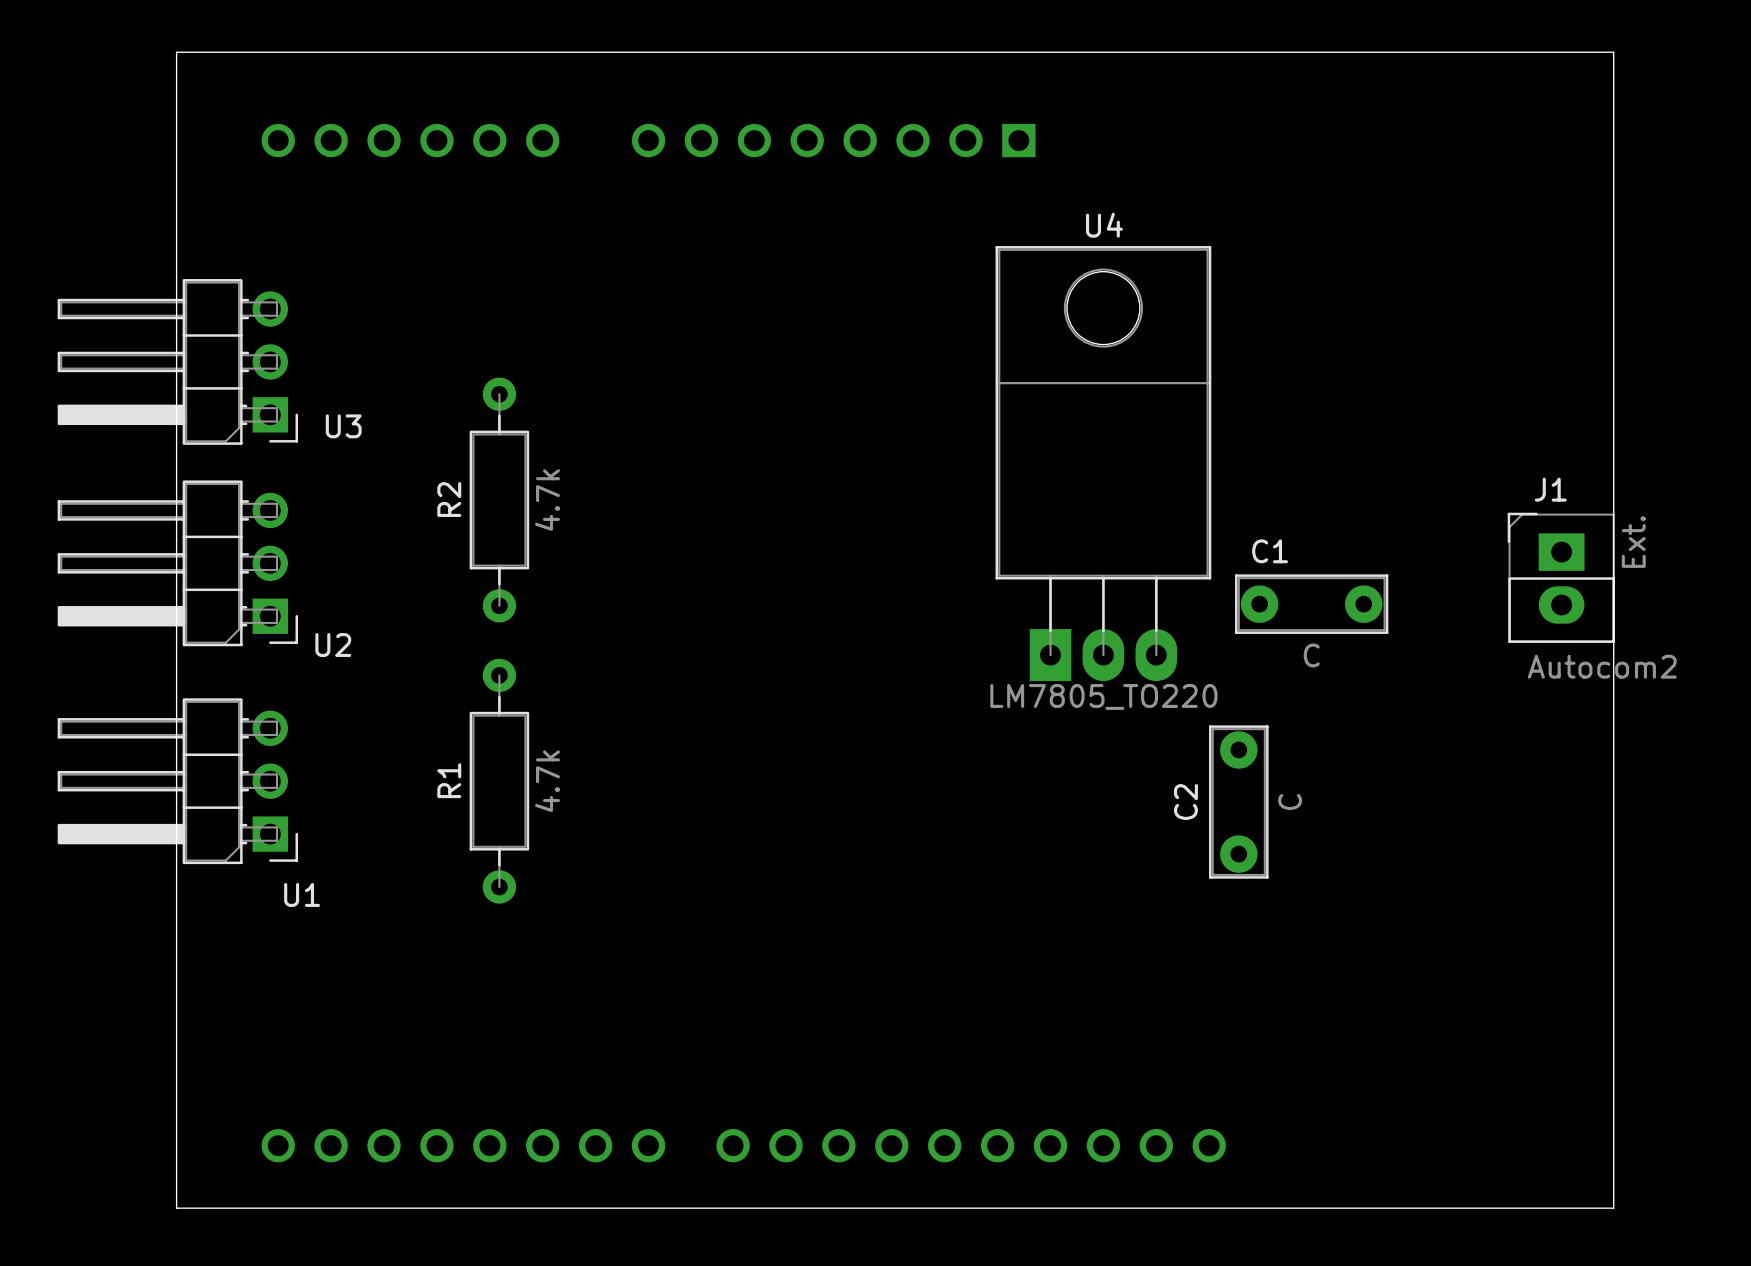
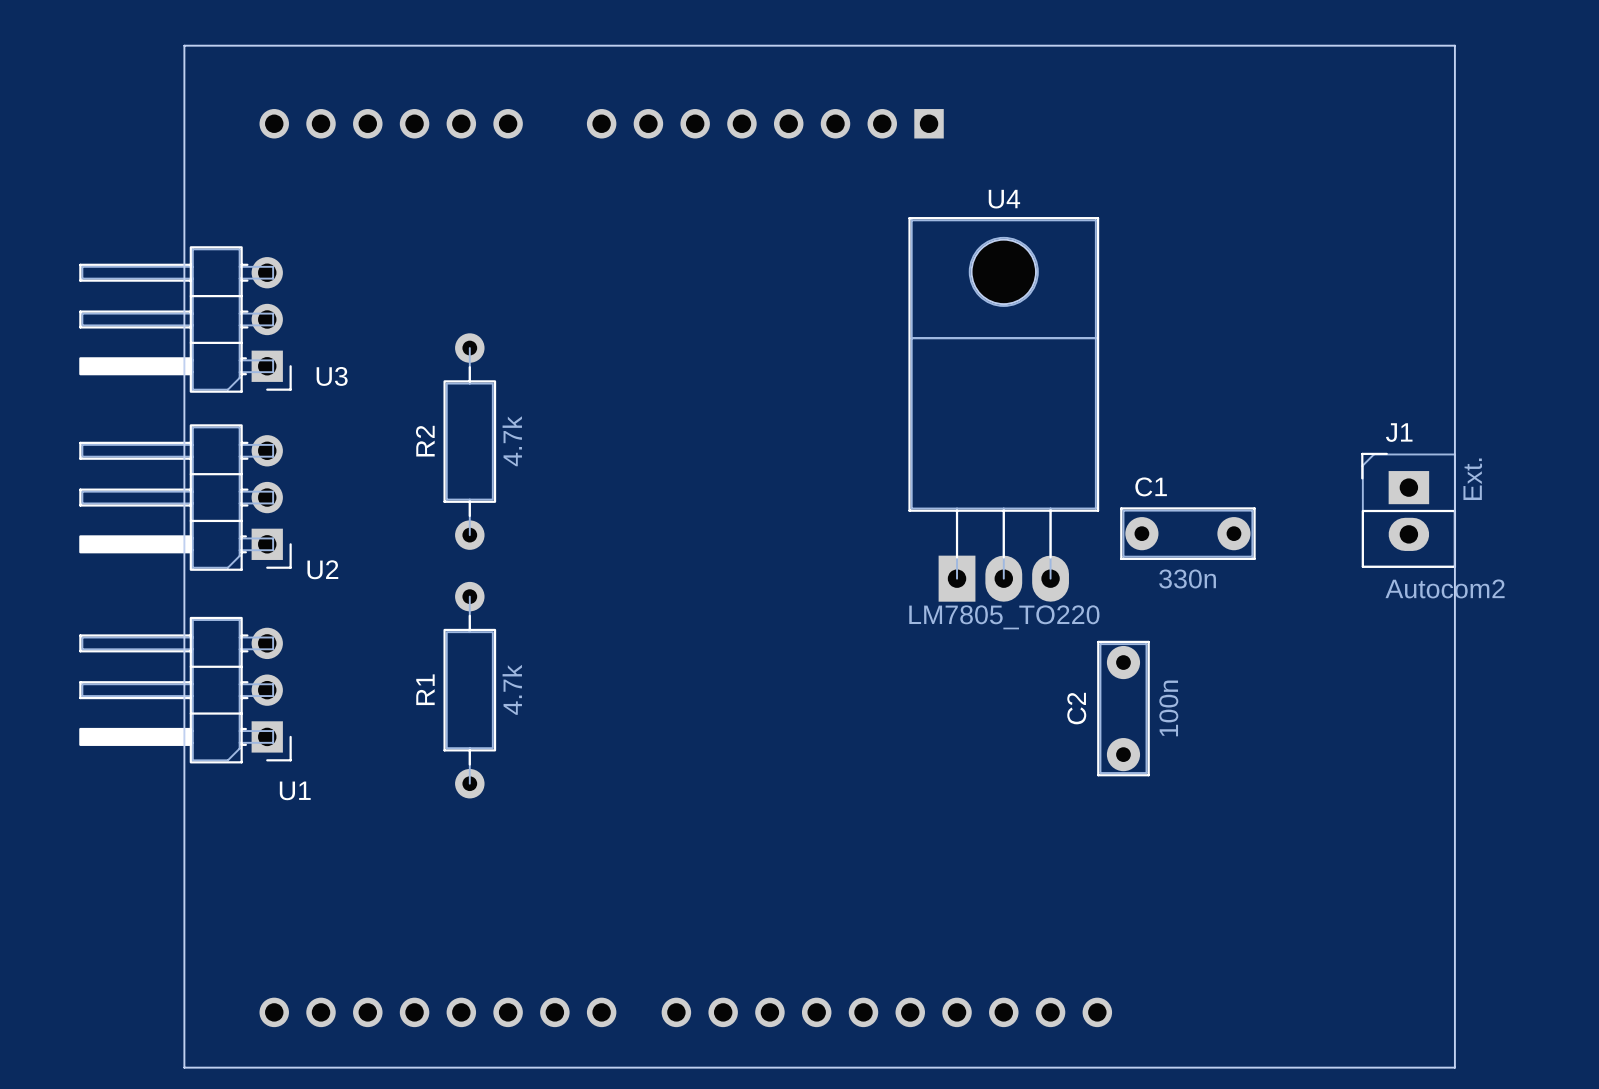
C1 value: C (1311, 655) -> 330n (1187, 578)
C2 value: C (1290, 802) -> 100n (1168, 708)

